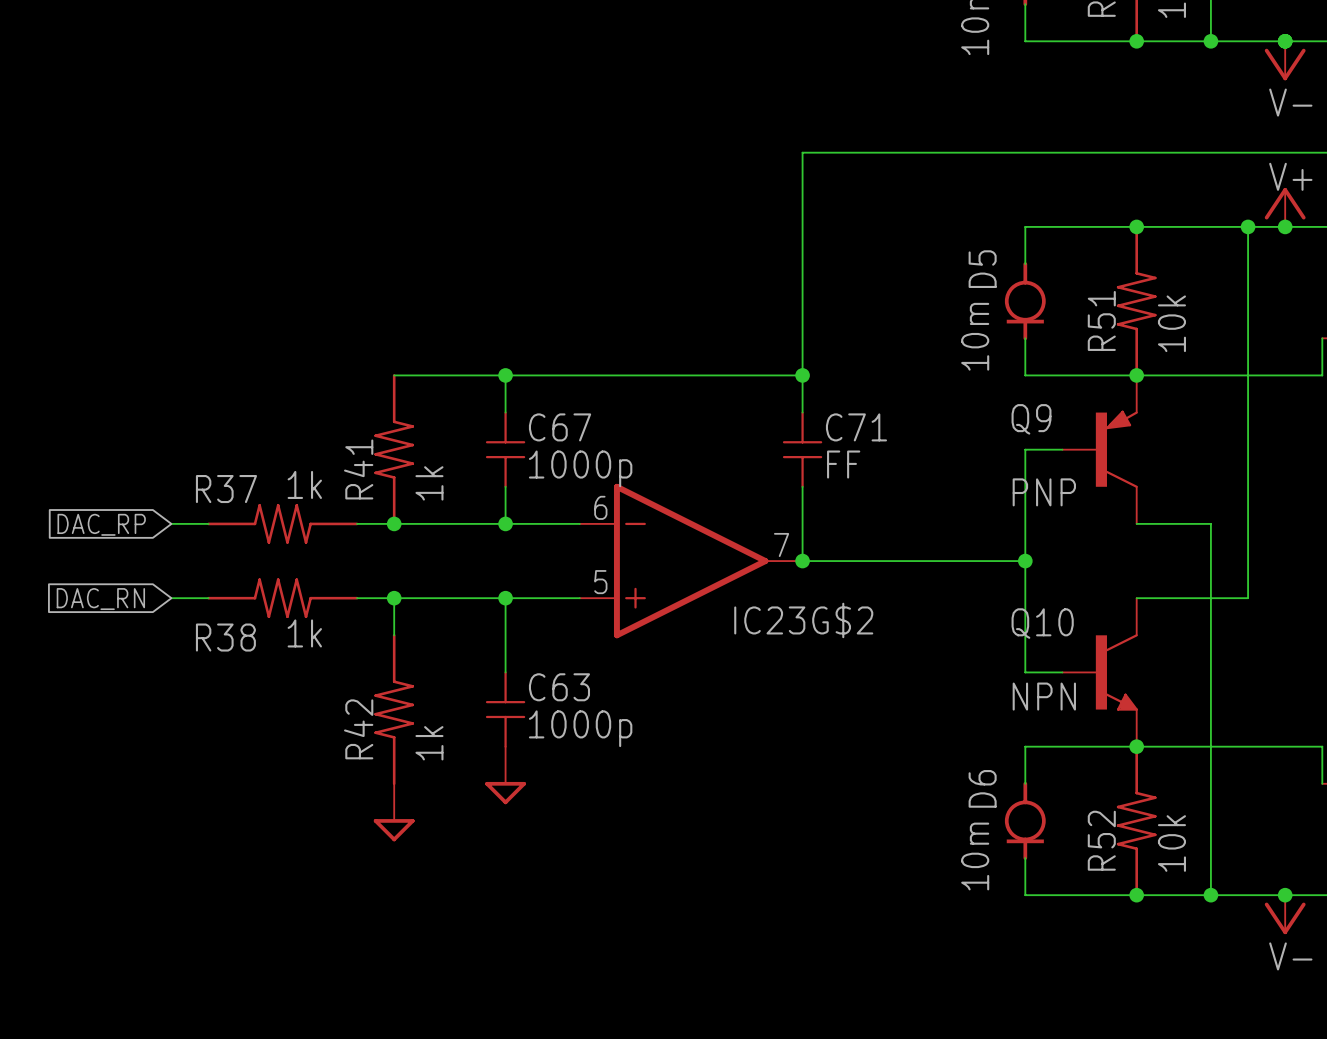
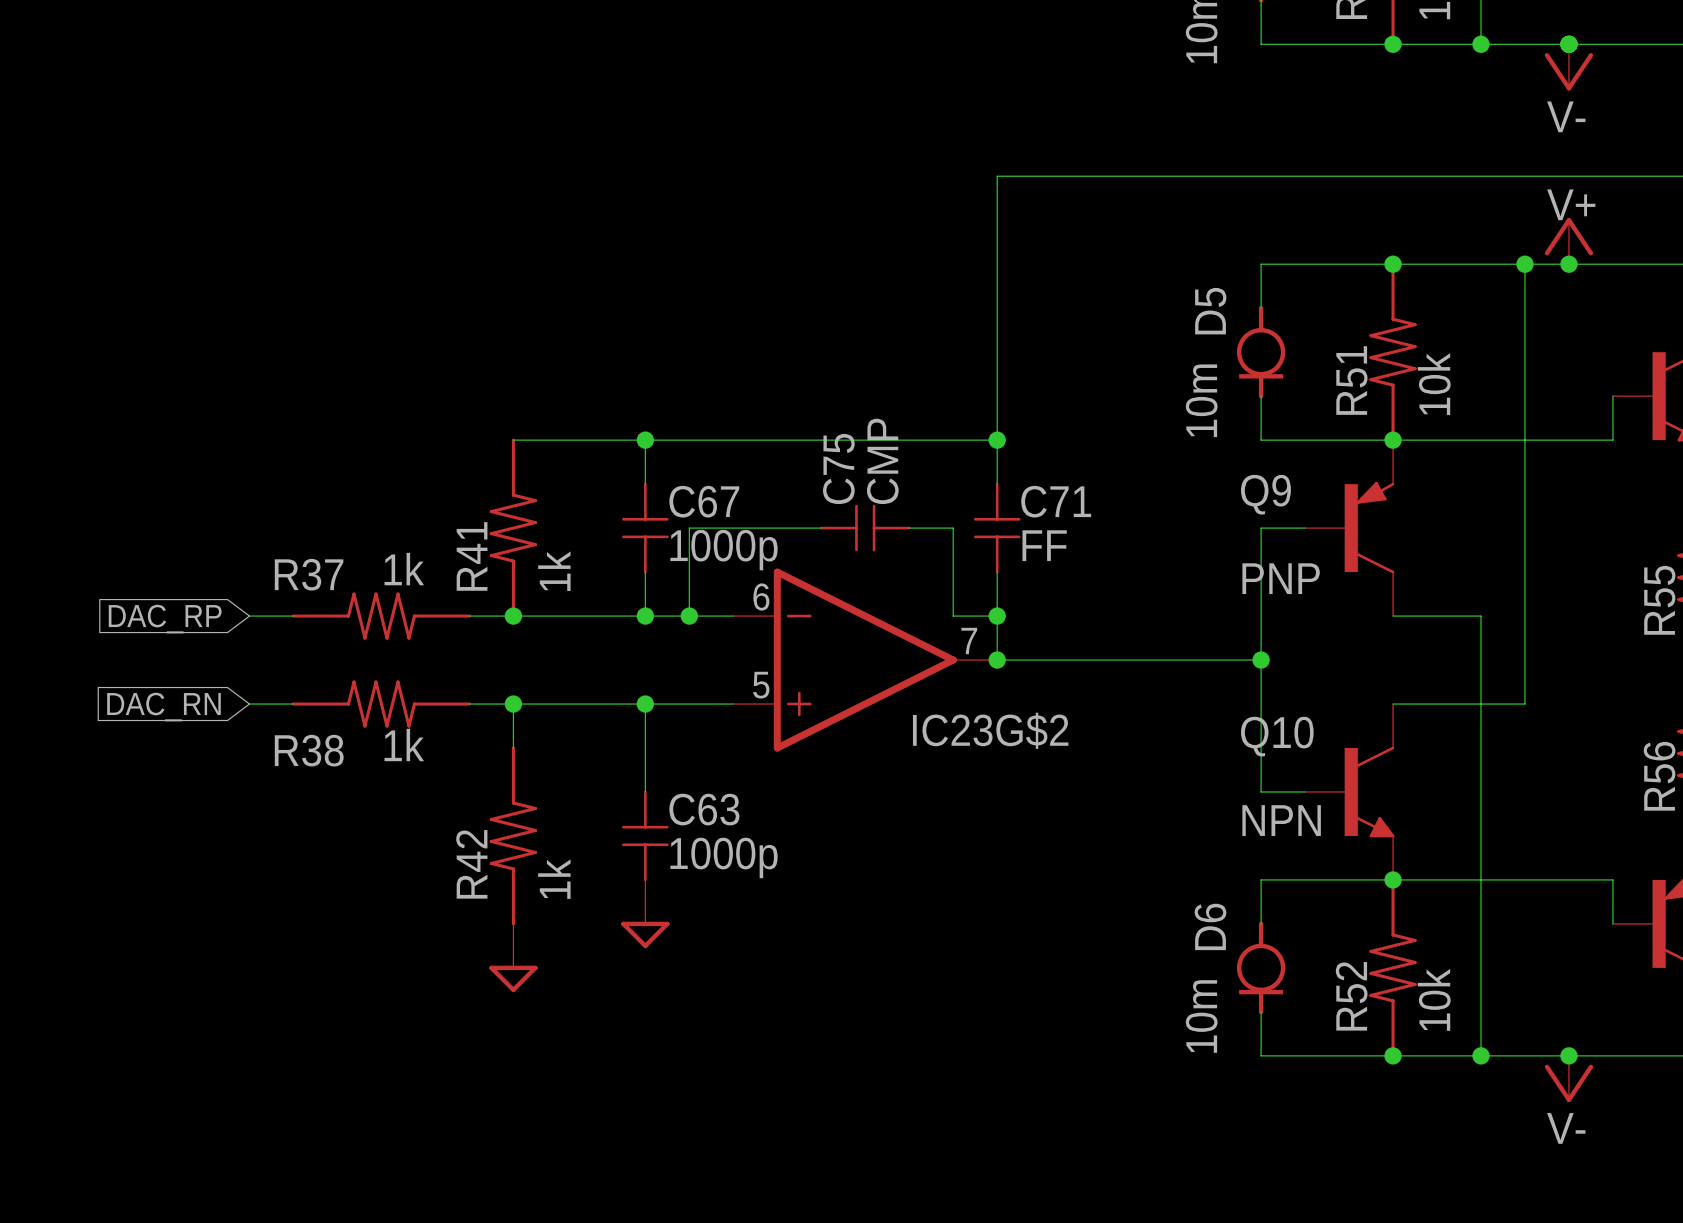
wire: none -> (821, 528) (689, 528) (689, 616)
C75: none -> CMP (865, 528)
wire: none -> (909, 528) (953, 528) (953, 616) (997, 616)
junction: none -> (689, 616)
junction: none -> (997, 616)

